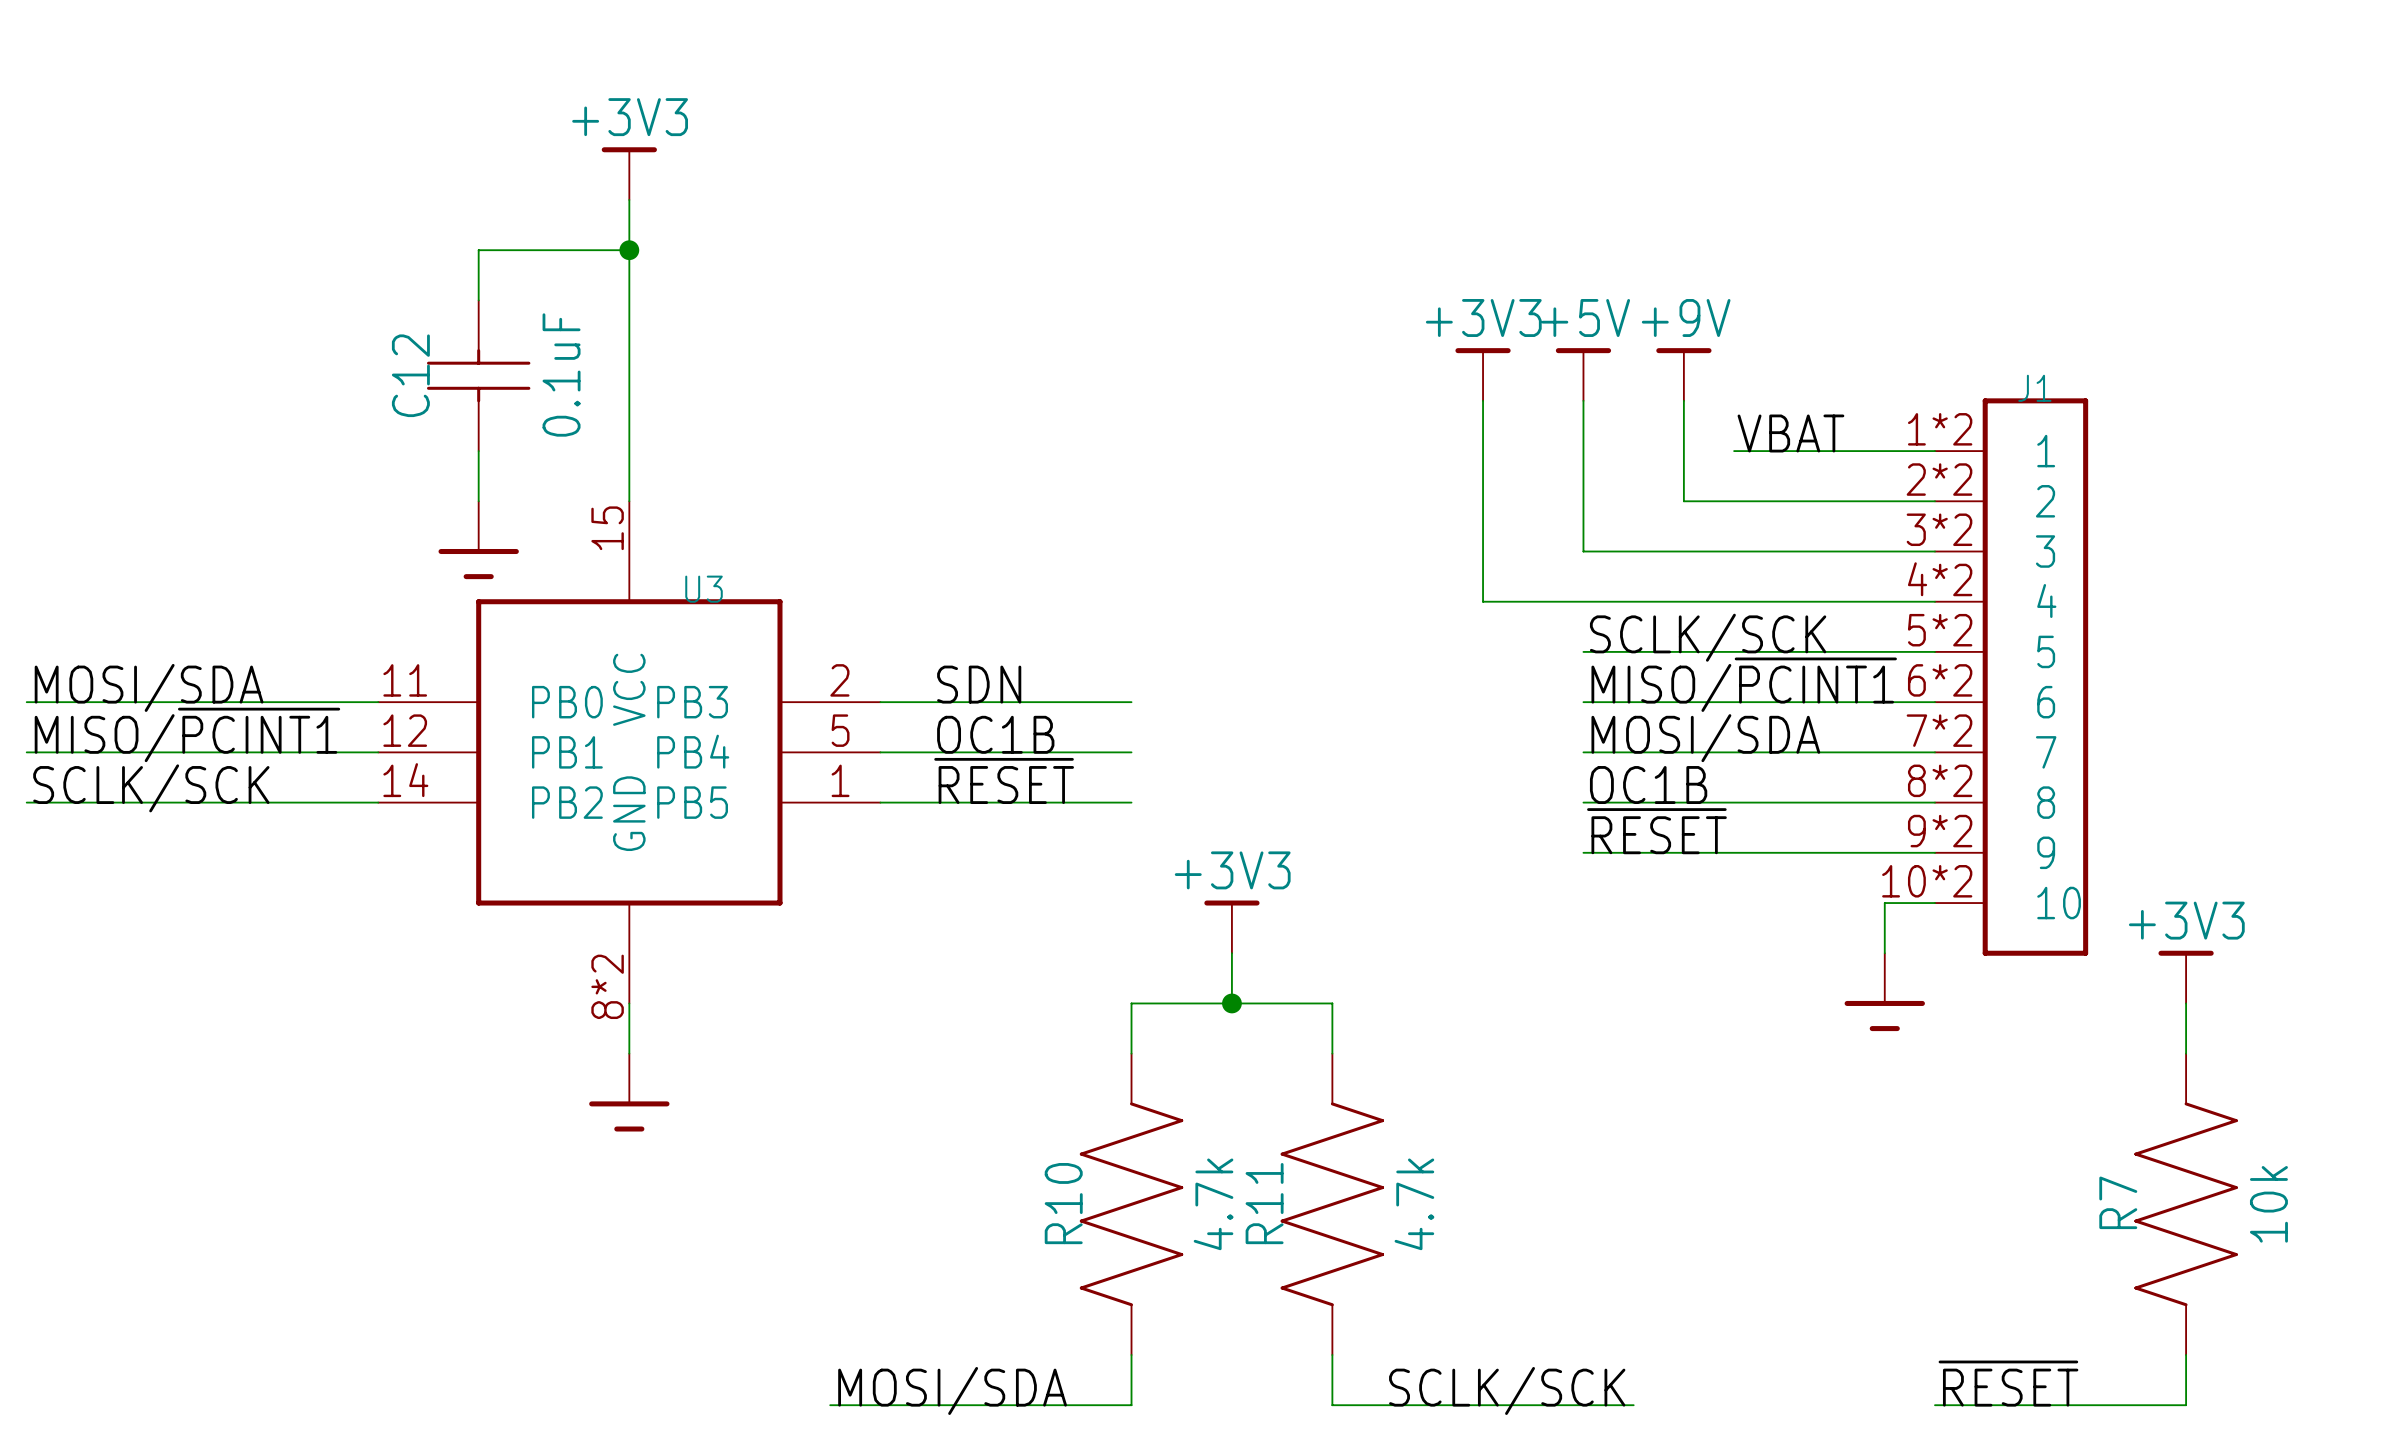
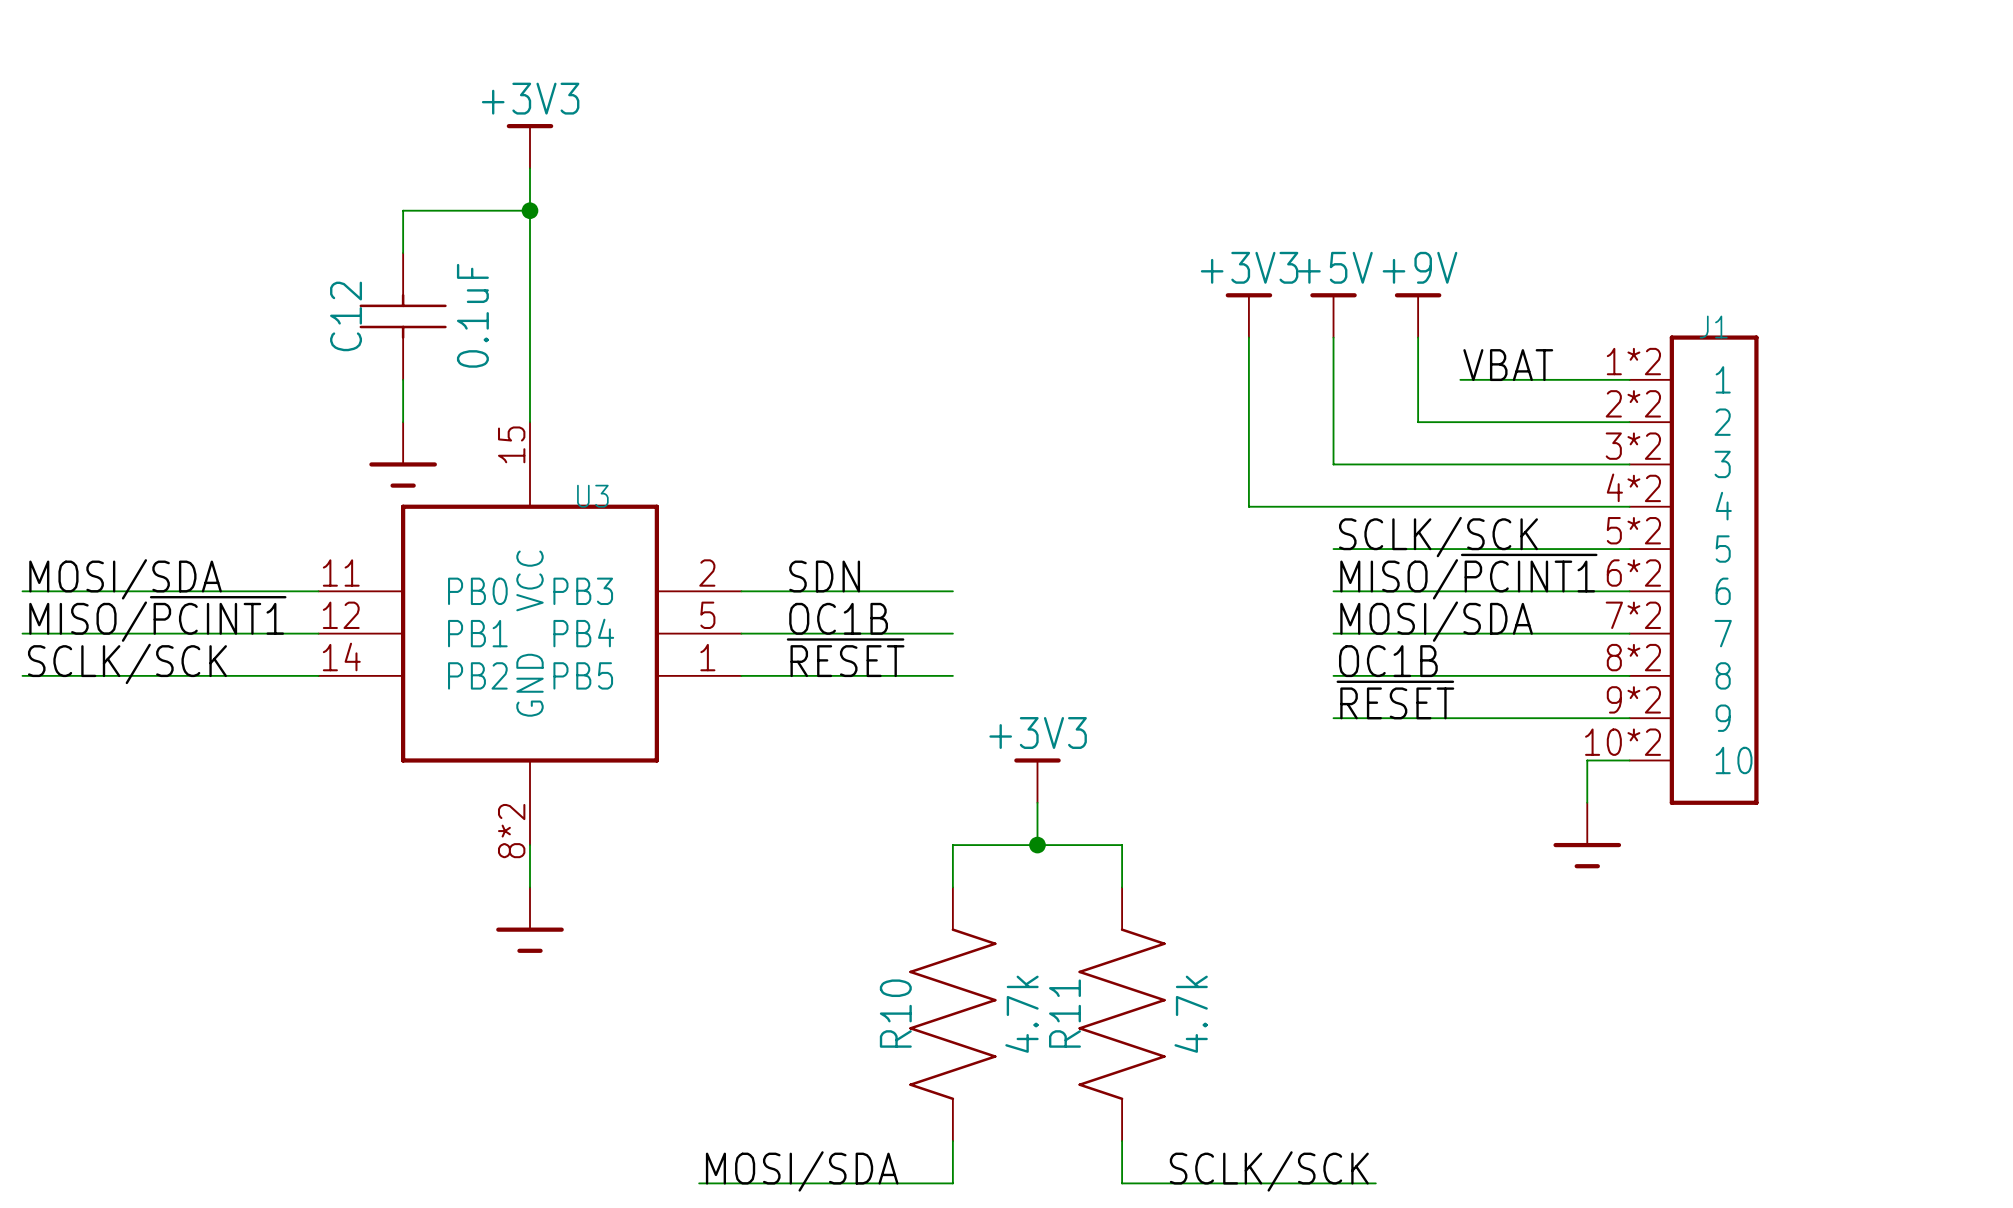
power symbol: +3V3 (2186, 977) -> none
wire: (2186, 1003) (2186, 1053) -> none
R7: 10k (2186, 1204) -> none
wire: (2186, 1354) (2186, 1405) (1934, 1405) -> none
label: ~{RESET} (2008, 1383) -> none

